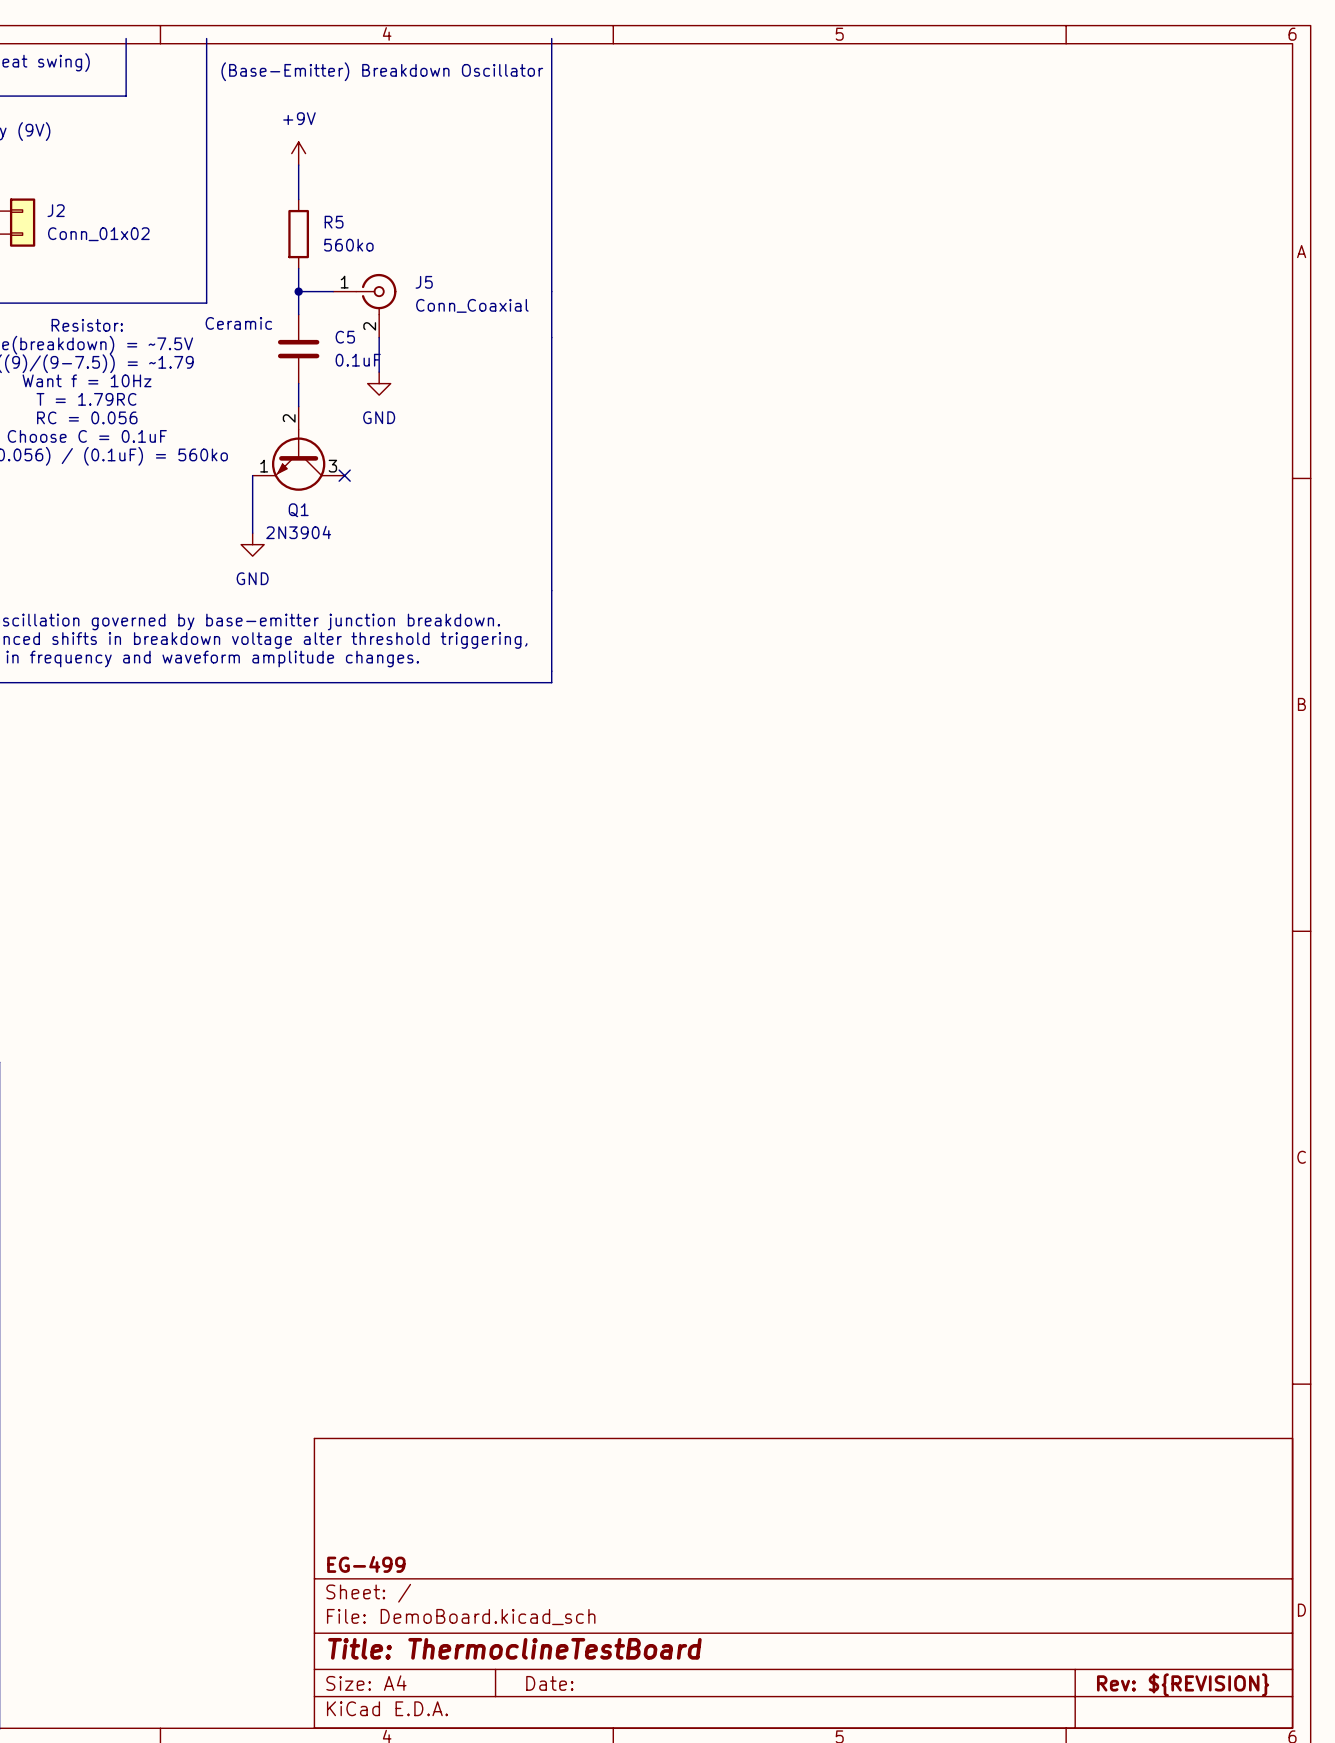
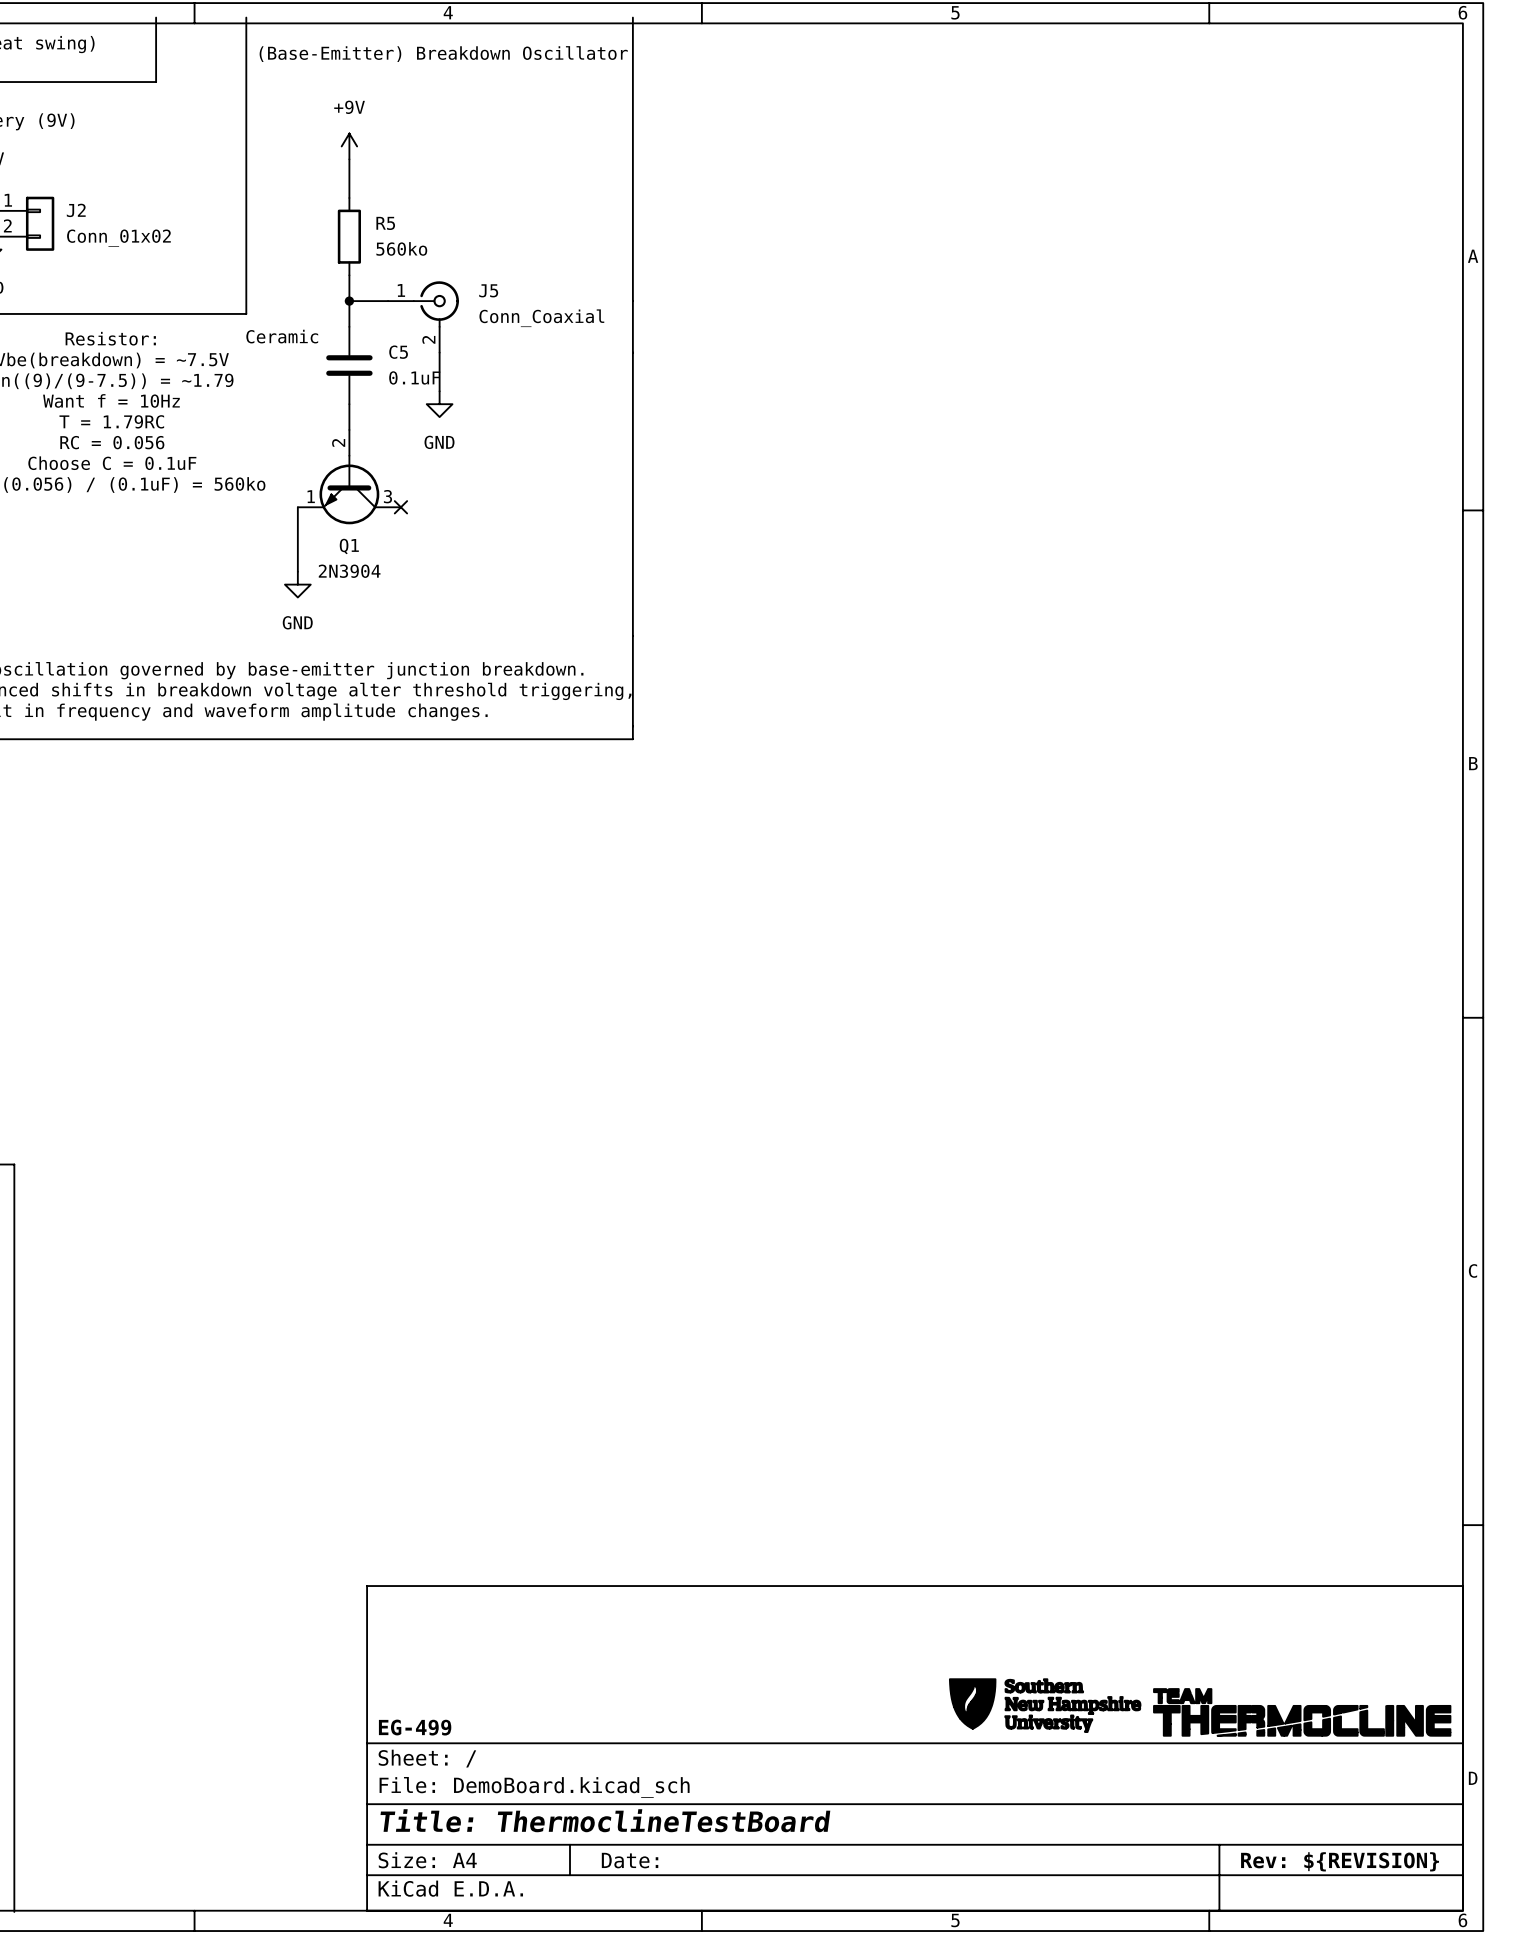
power symbol: none -> (1045, 1705)
power symbol: none -> (1302, 1712)

